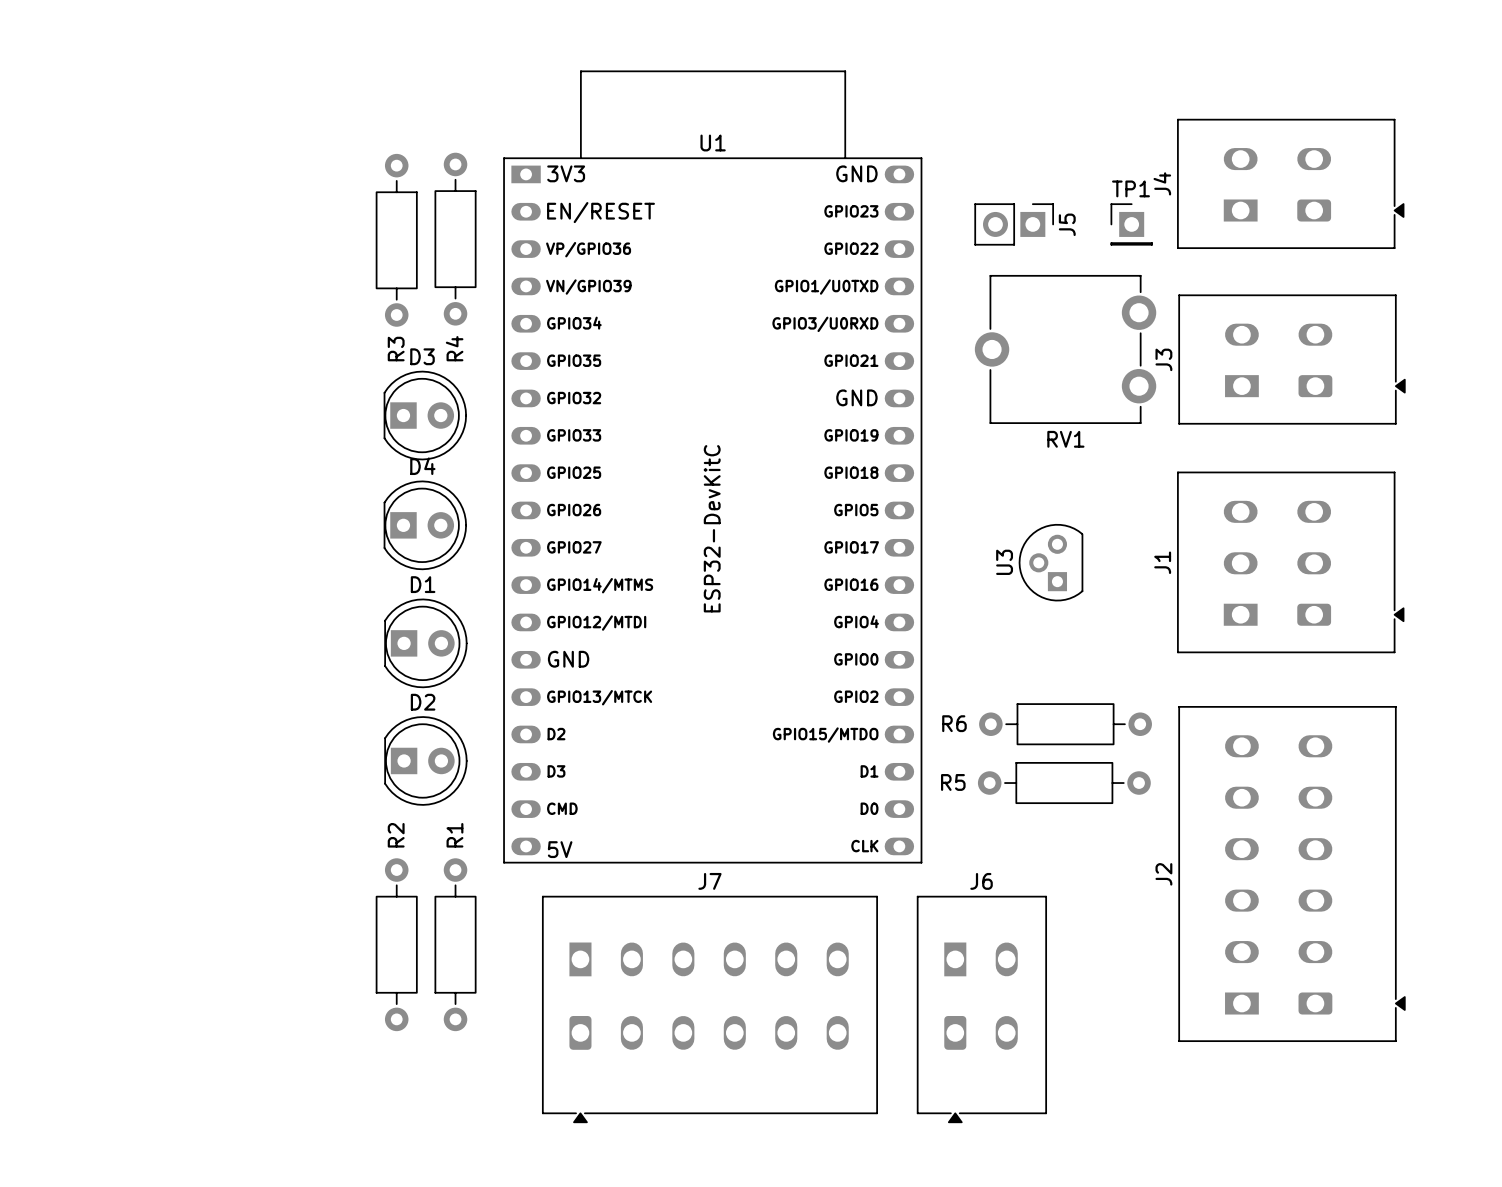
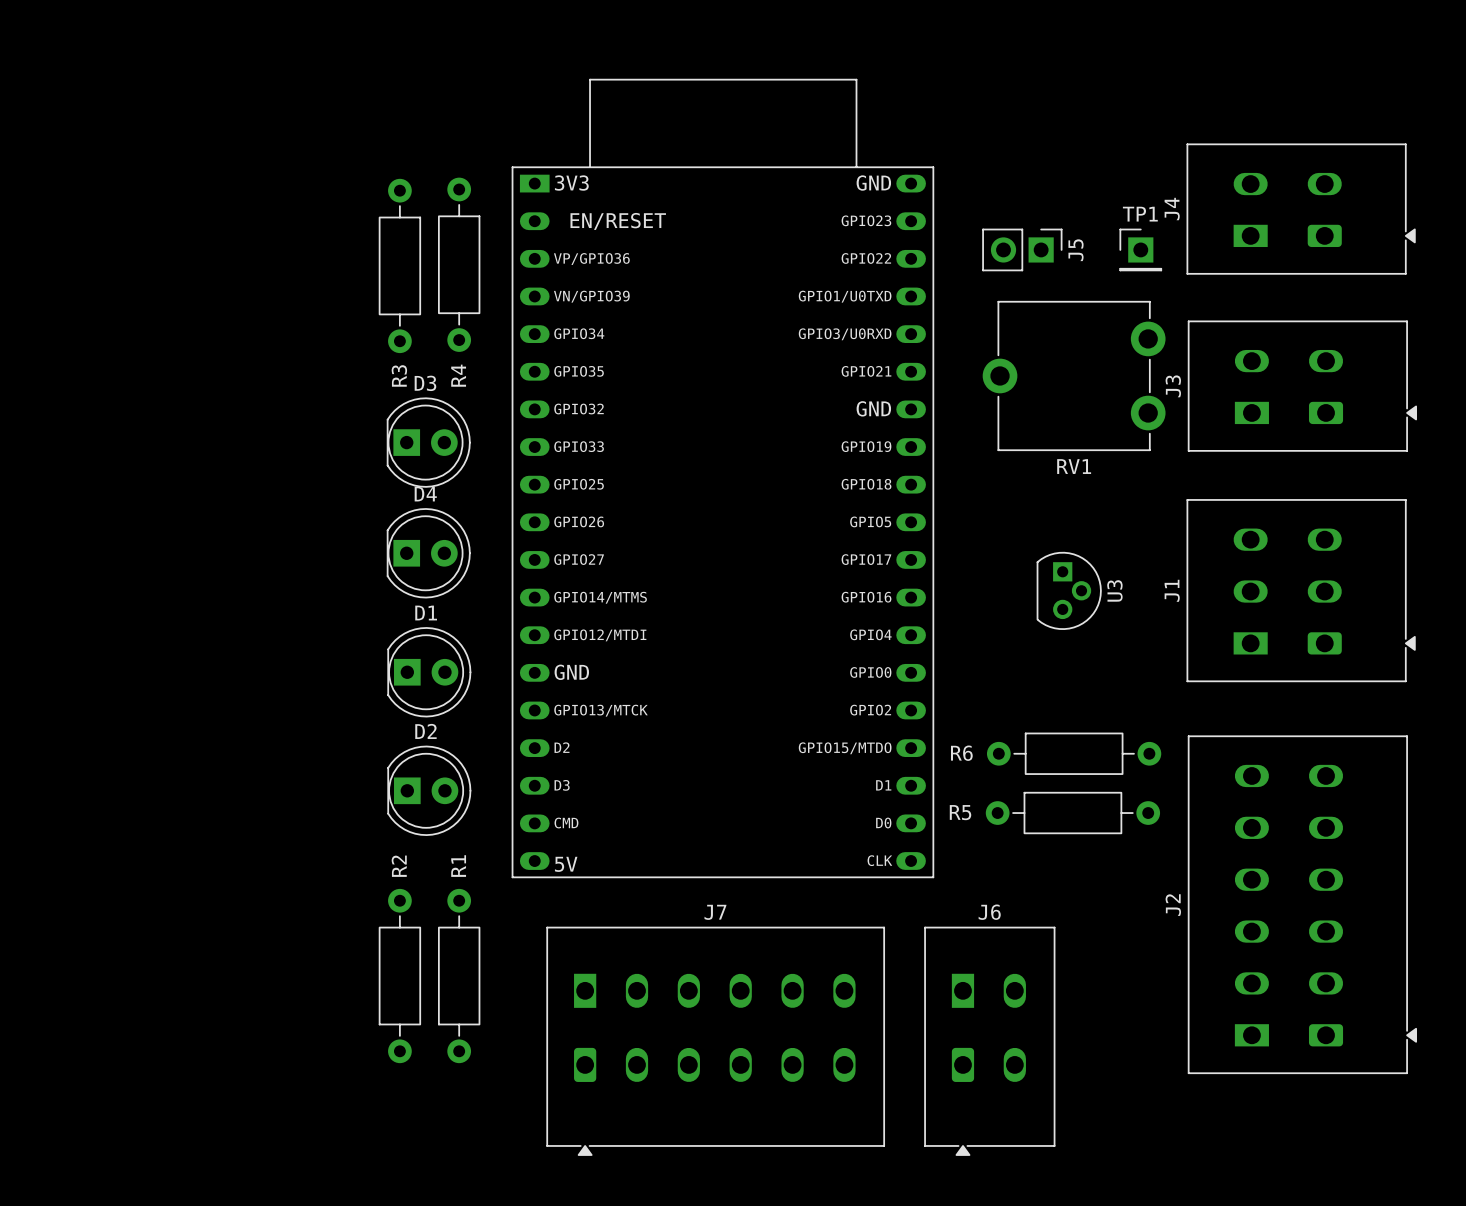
part: none -> (722, 478)
U1: ESP32-DevKitC (712, 466) -> none
U3 rotation: 0° (1050, 562) -> 180° (1069, 590)

